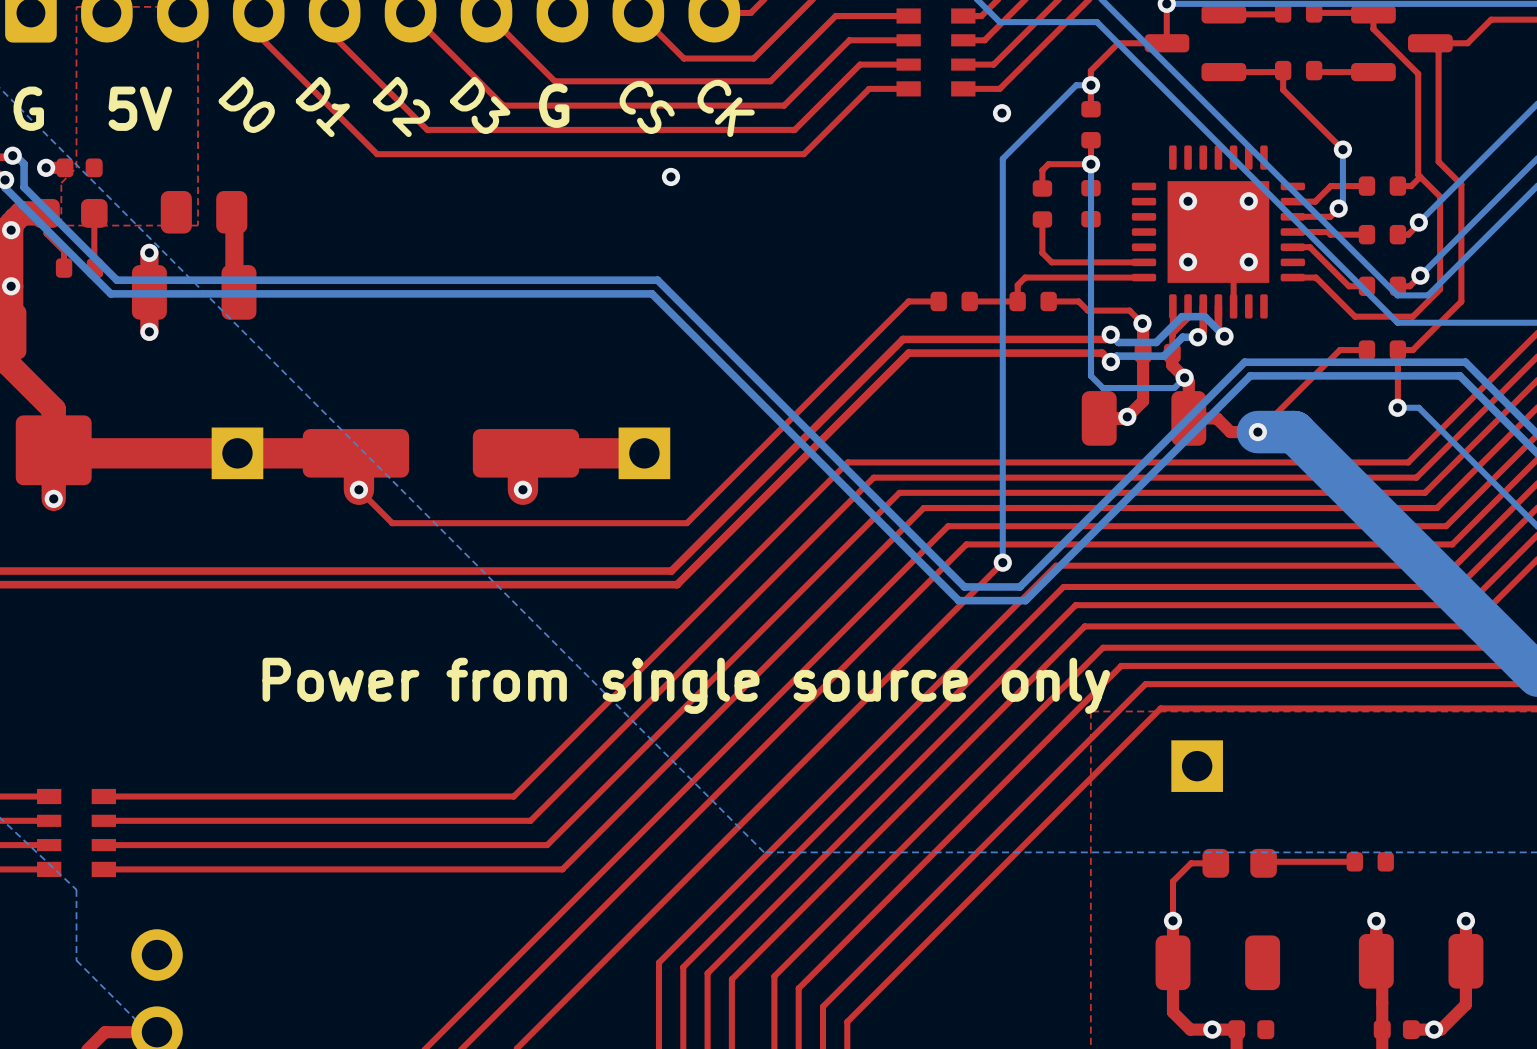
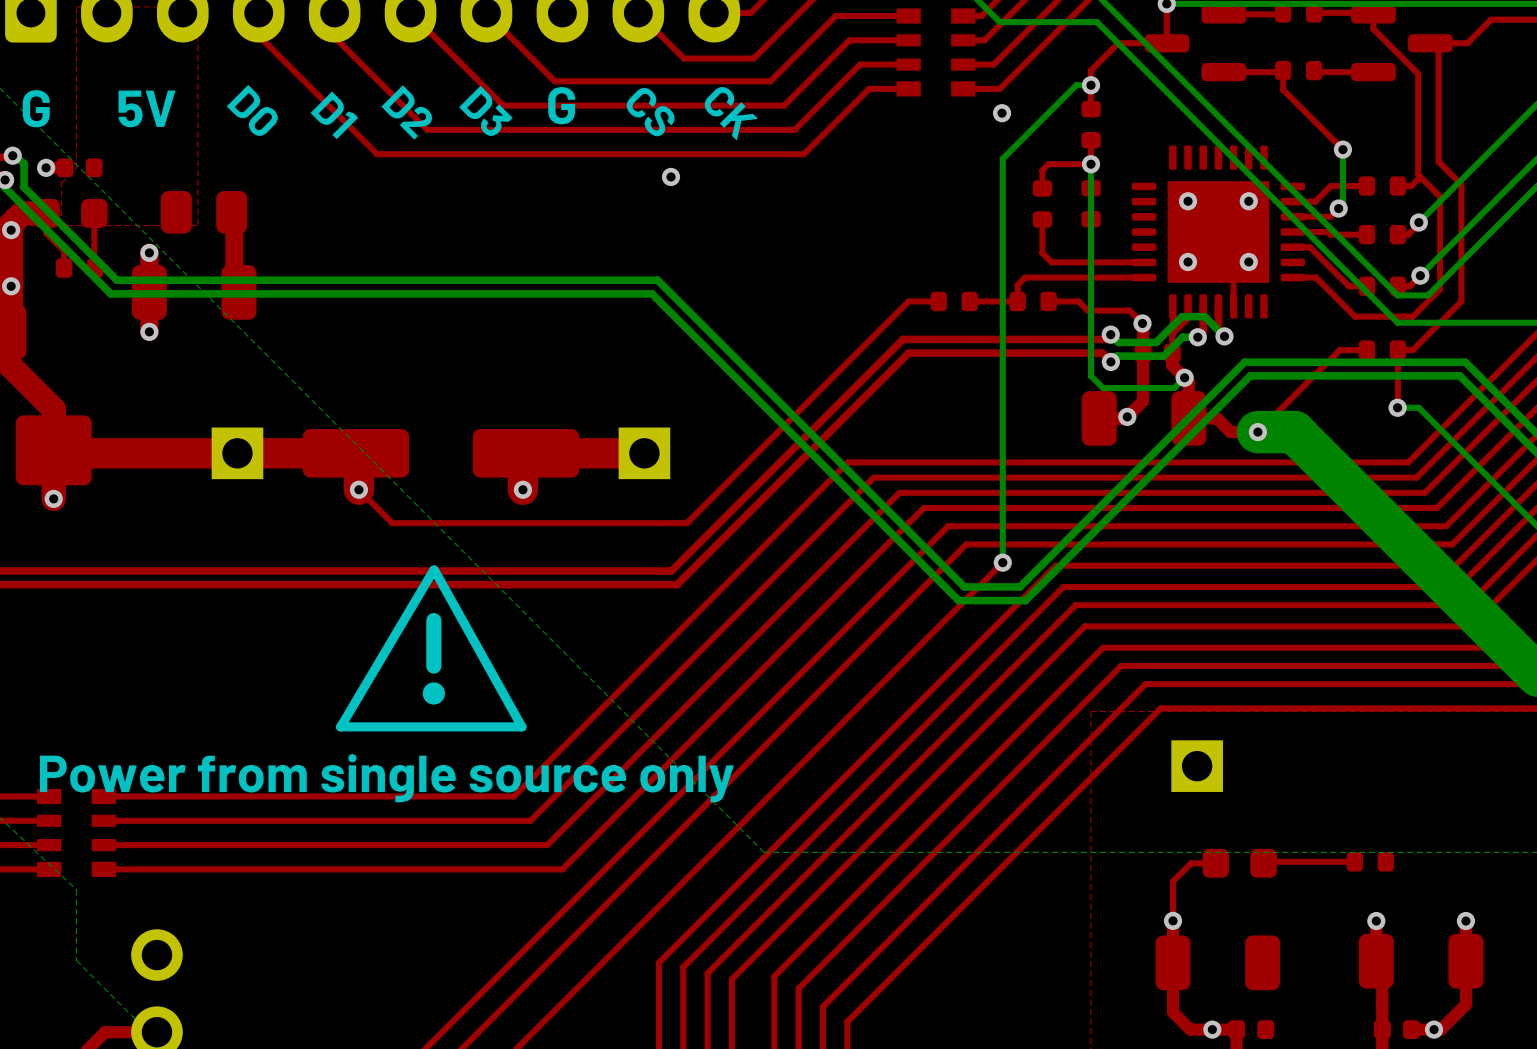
line: none -> (434, 569) (521, 726) (340, 726) (433, 569)
line: none -> (433, 620) (433, 666)
drawing: none -> [422, 682, 445, 705]
text position: Power from single source only (686, 685) -> Power from single source only (386, 778)

